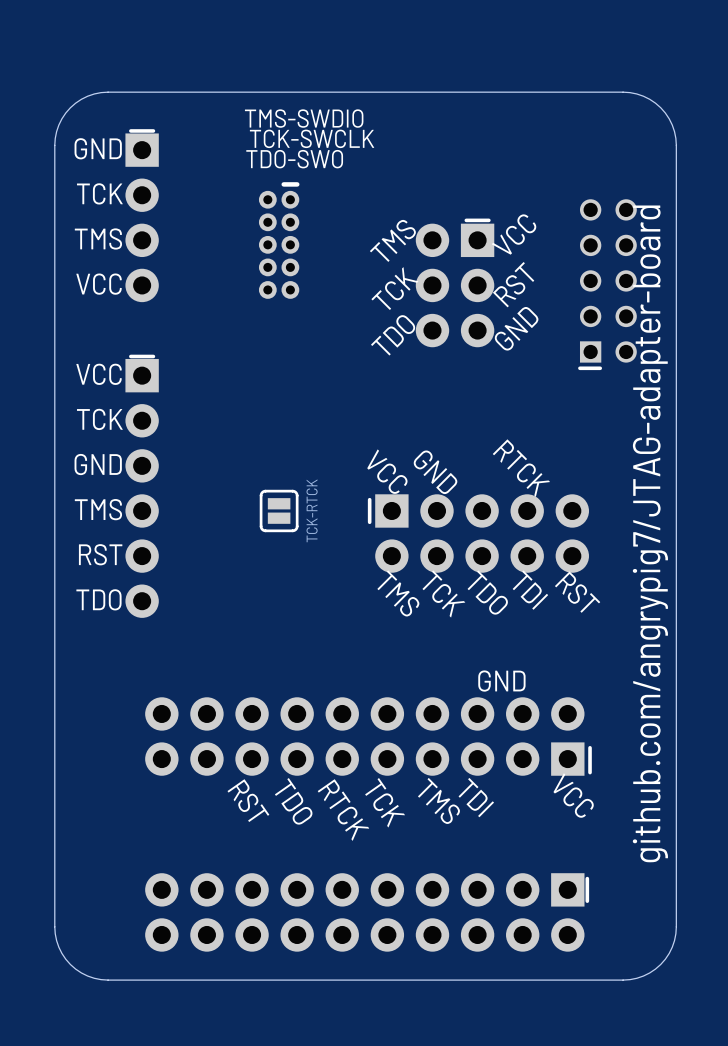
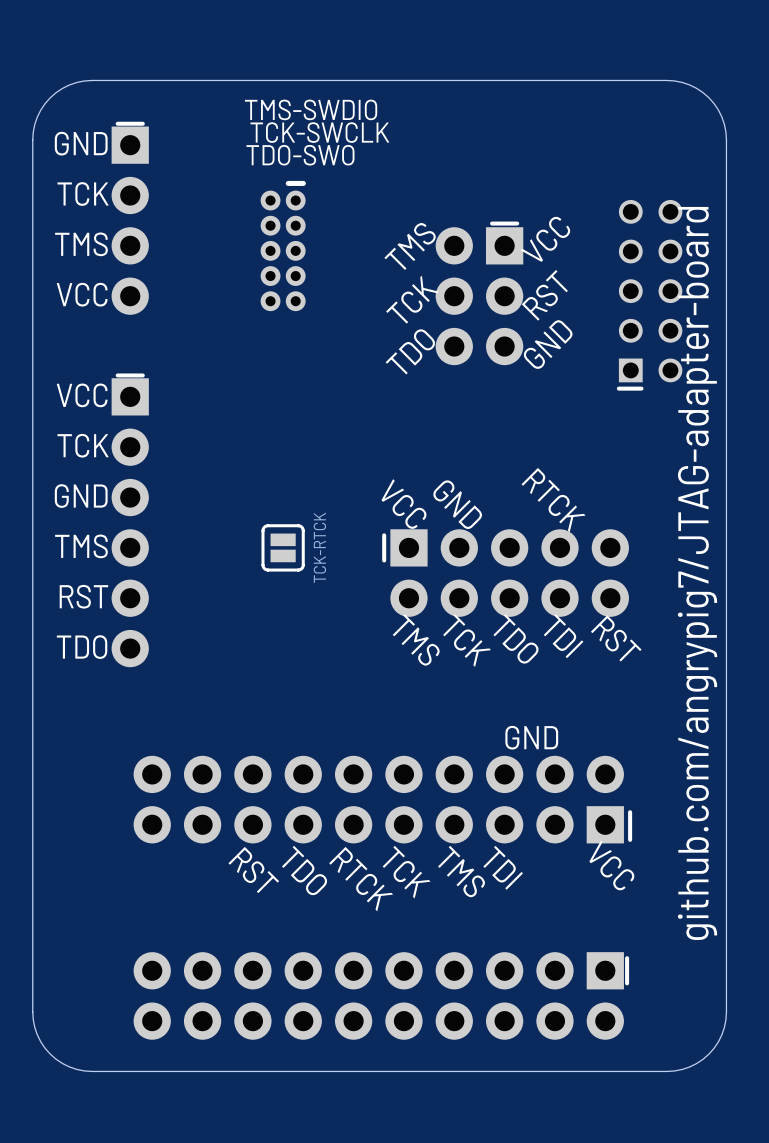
text rotation: 0° (248, 800) -> 10° counterclockwise (253, 870)
text rotation: 0° (293, 801) -> 10° counterclockwise (304, 870)
text rotation: 0° (385, 802) -> 10° counterclockwise (406, 872)
text rotation: 0° (343, 810) -> 10° counterclockwise (361, 879)

